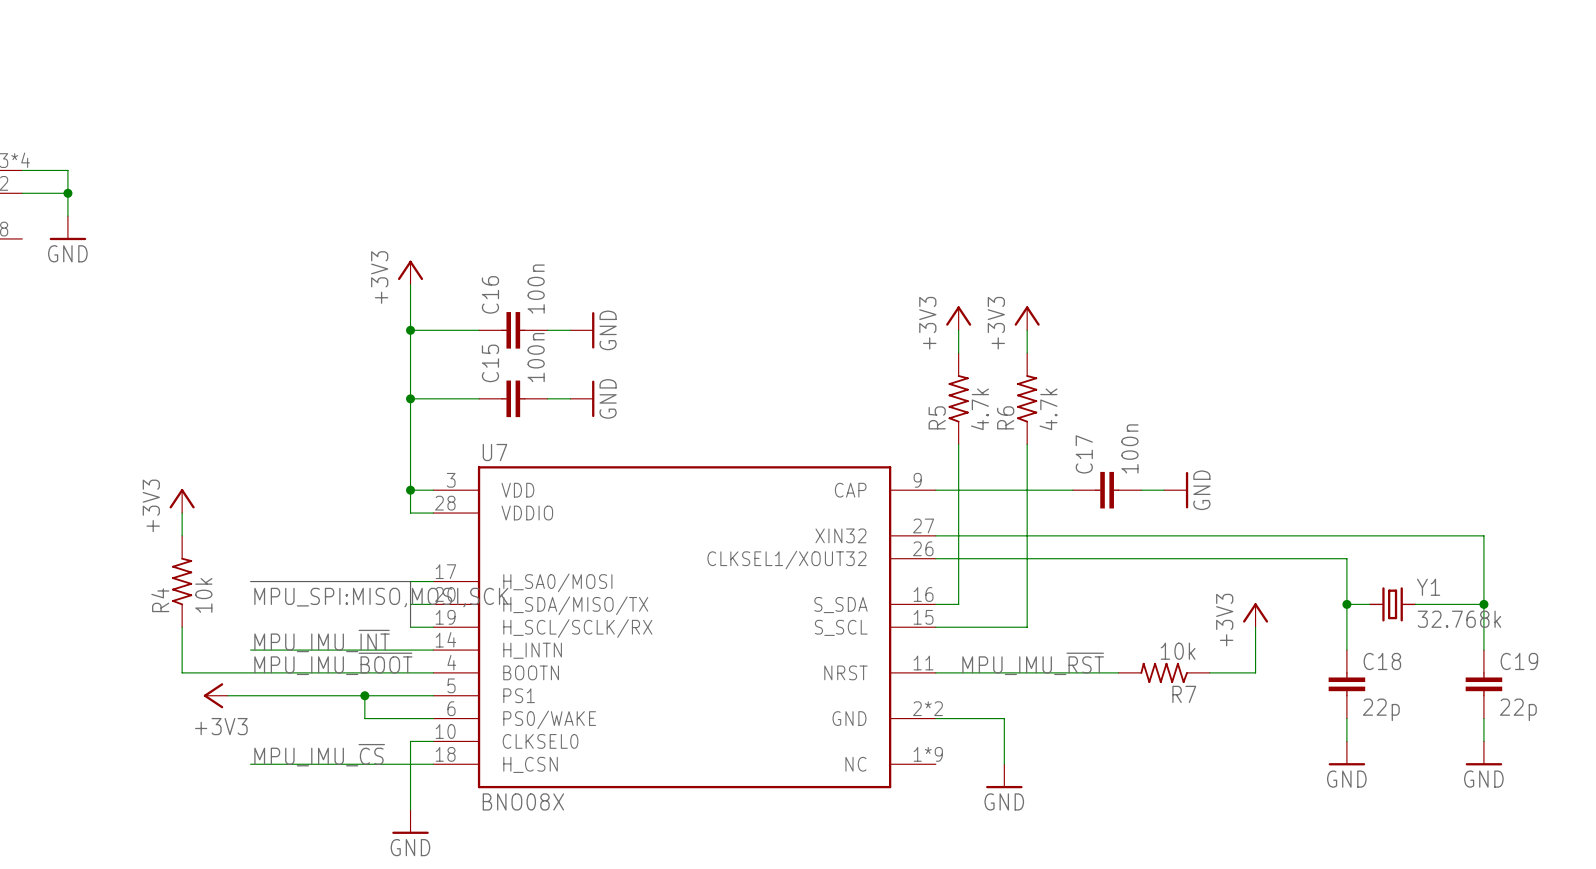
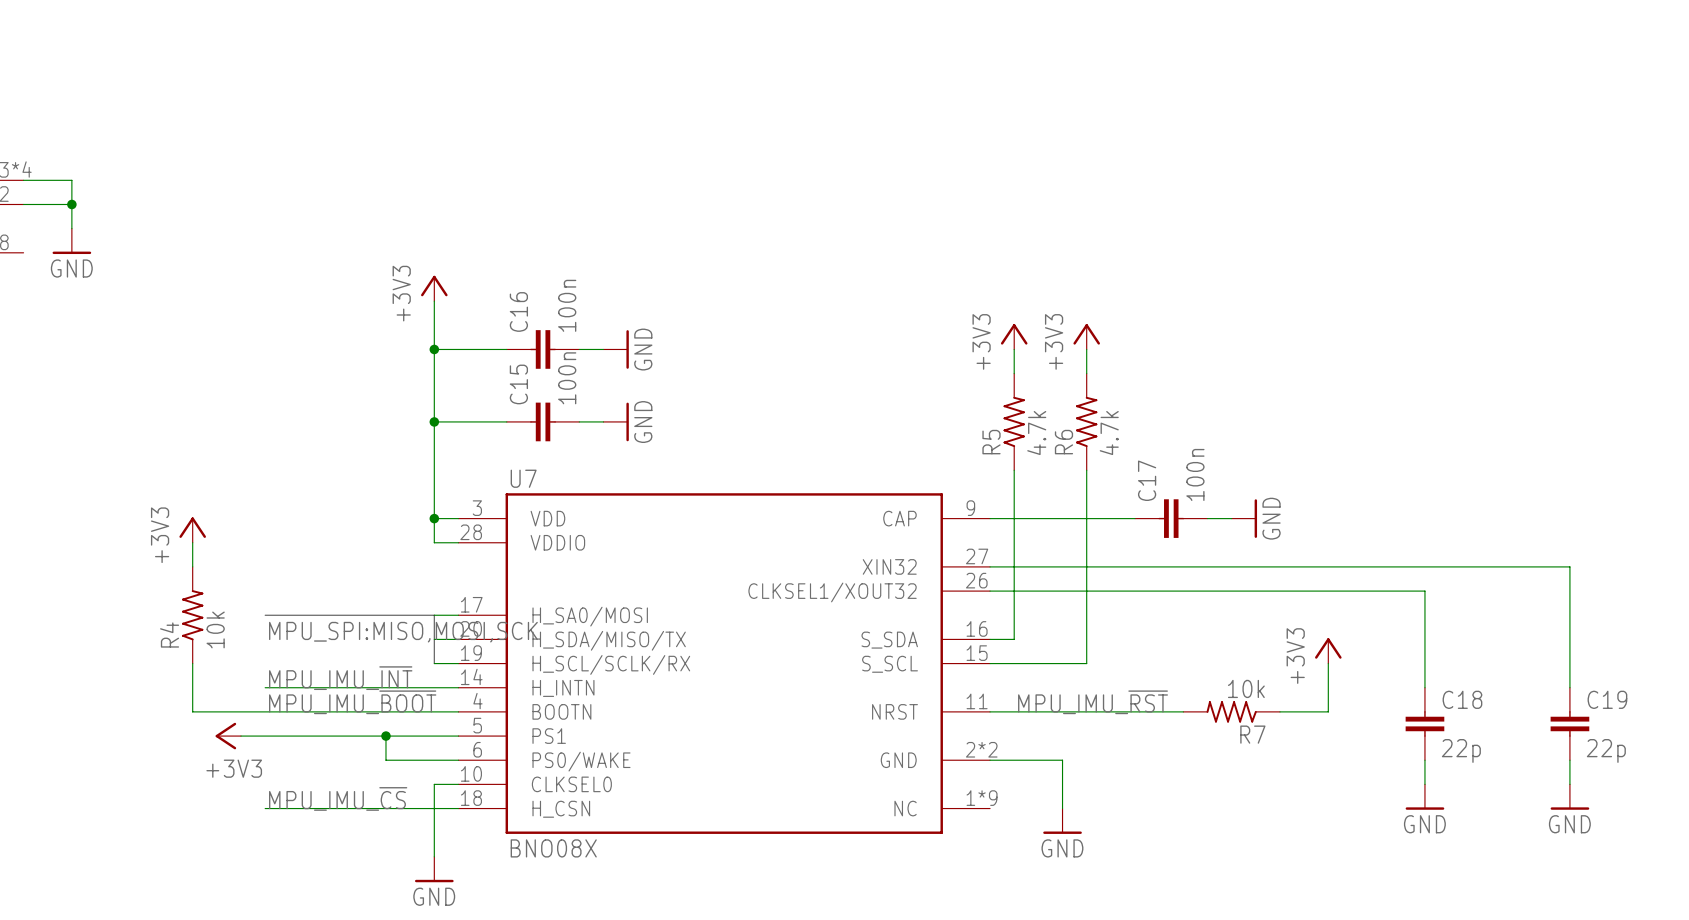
wire: (1346, 604) (1369, 604) -> none
junction: (1346, 604) -> none
Y1: 32.768k (1392, 604) -> none
wire: (1415, 604) (1483, 604) -> none
junction: (1483, 604) -> none

